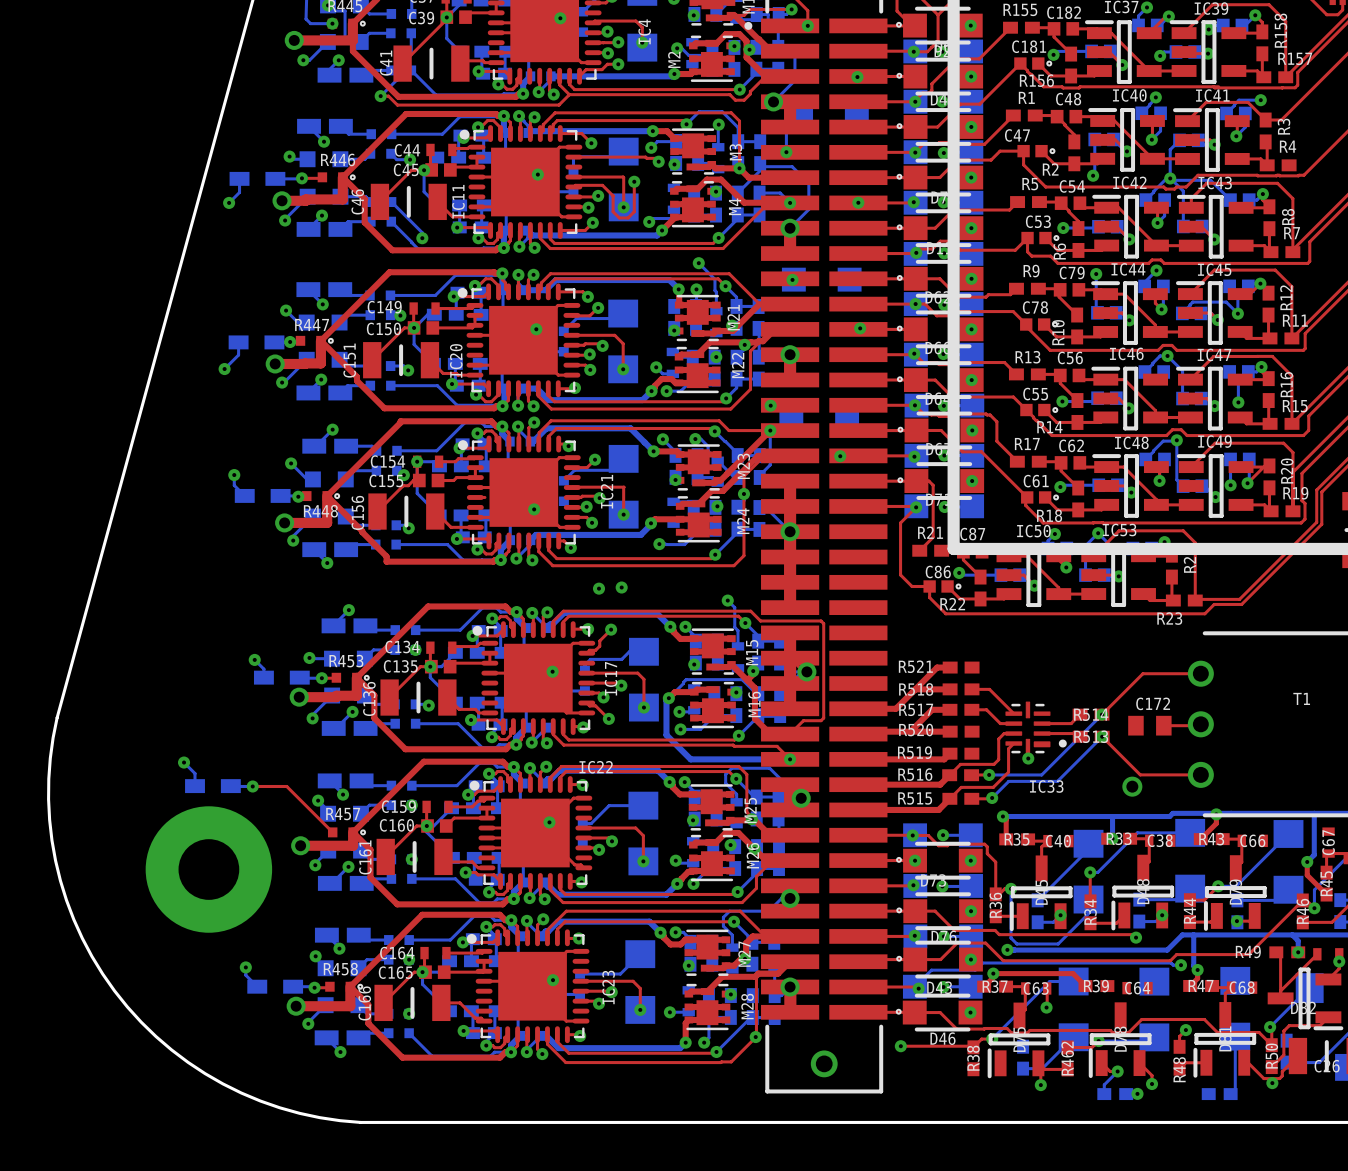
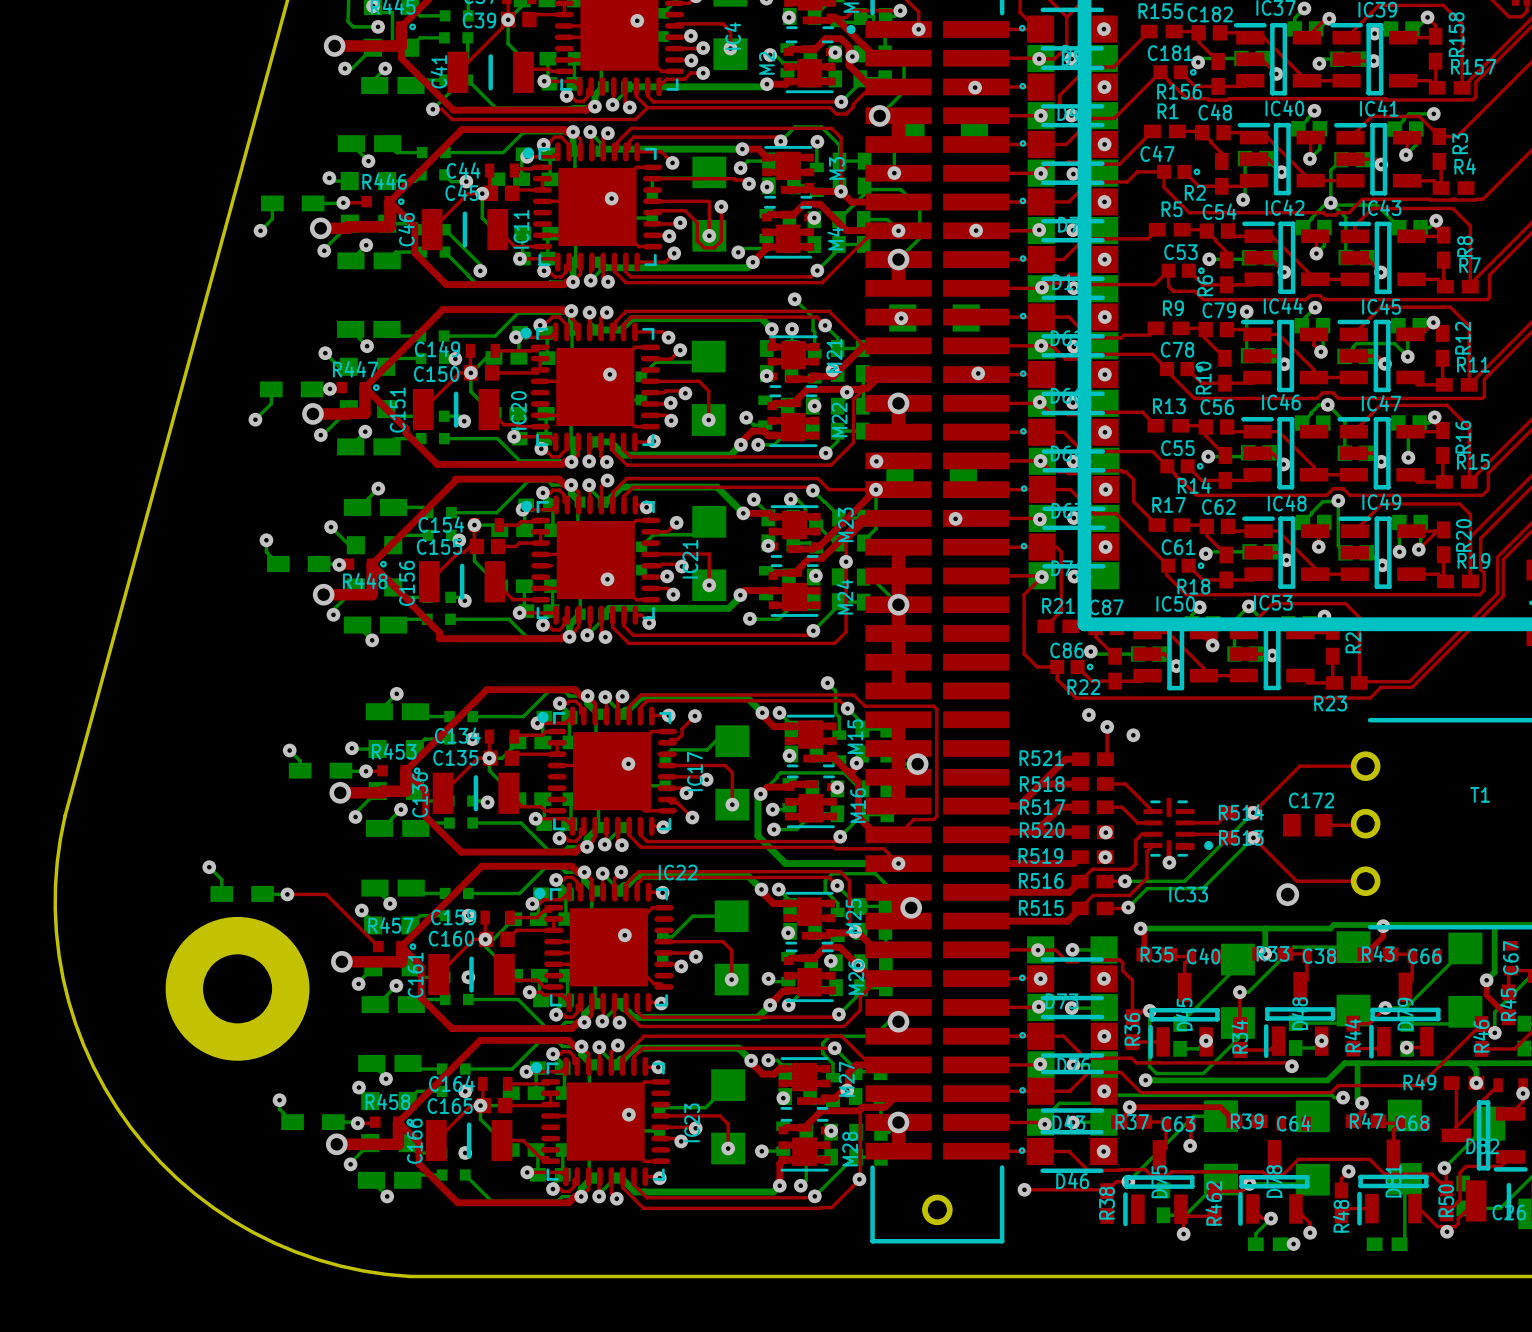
via: (621, 587) -> none
via: (599, 588) -> none
via: none -> (1088, 714)
top track: none -> (1107, 726) (1107, 757) (1105, 759)
via: none -> (1107, 726)
via: none -> (1133, 735)
via: none -> (1105, 832)
via: none -> (1105, 857)

